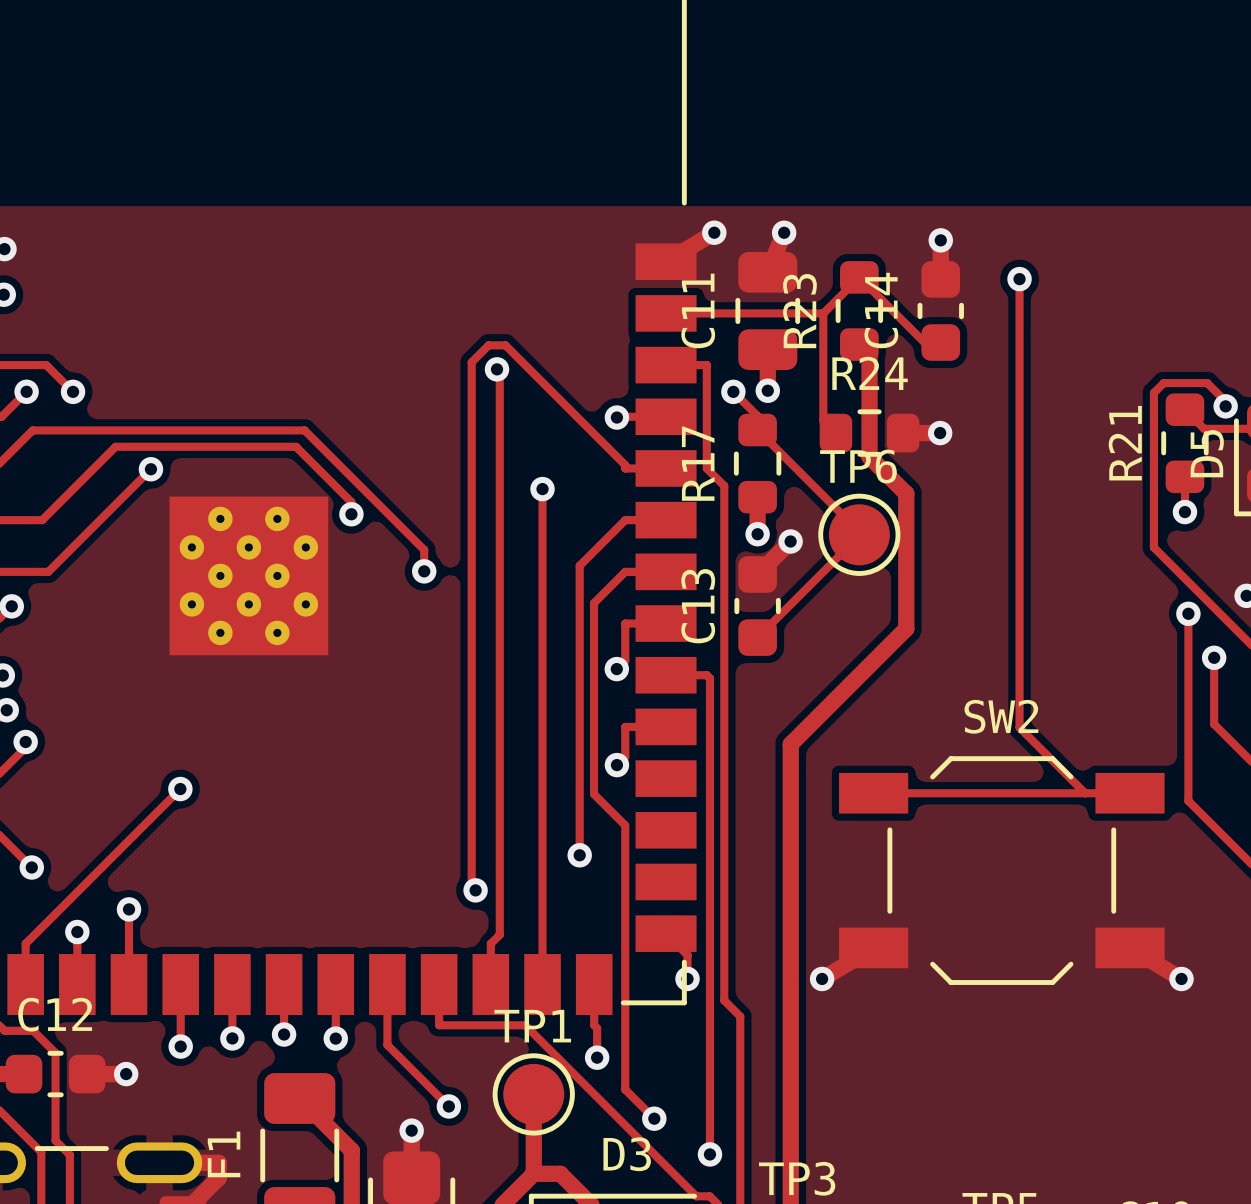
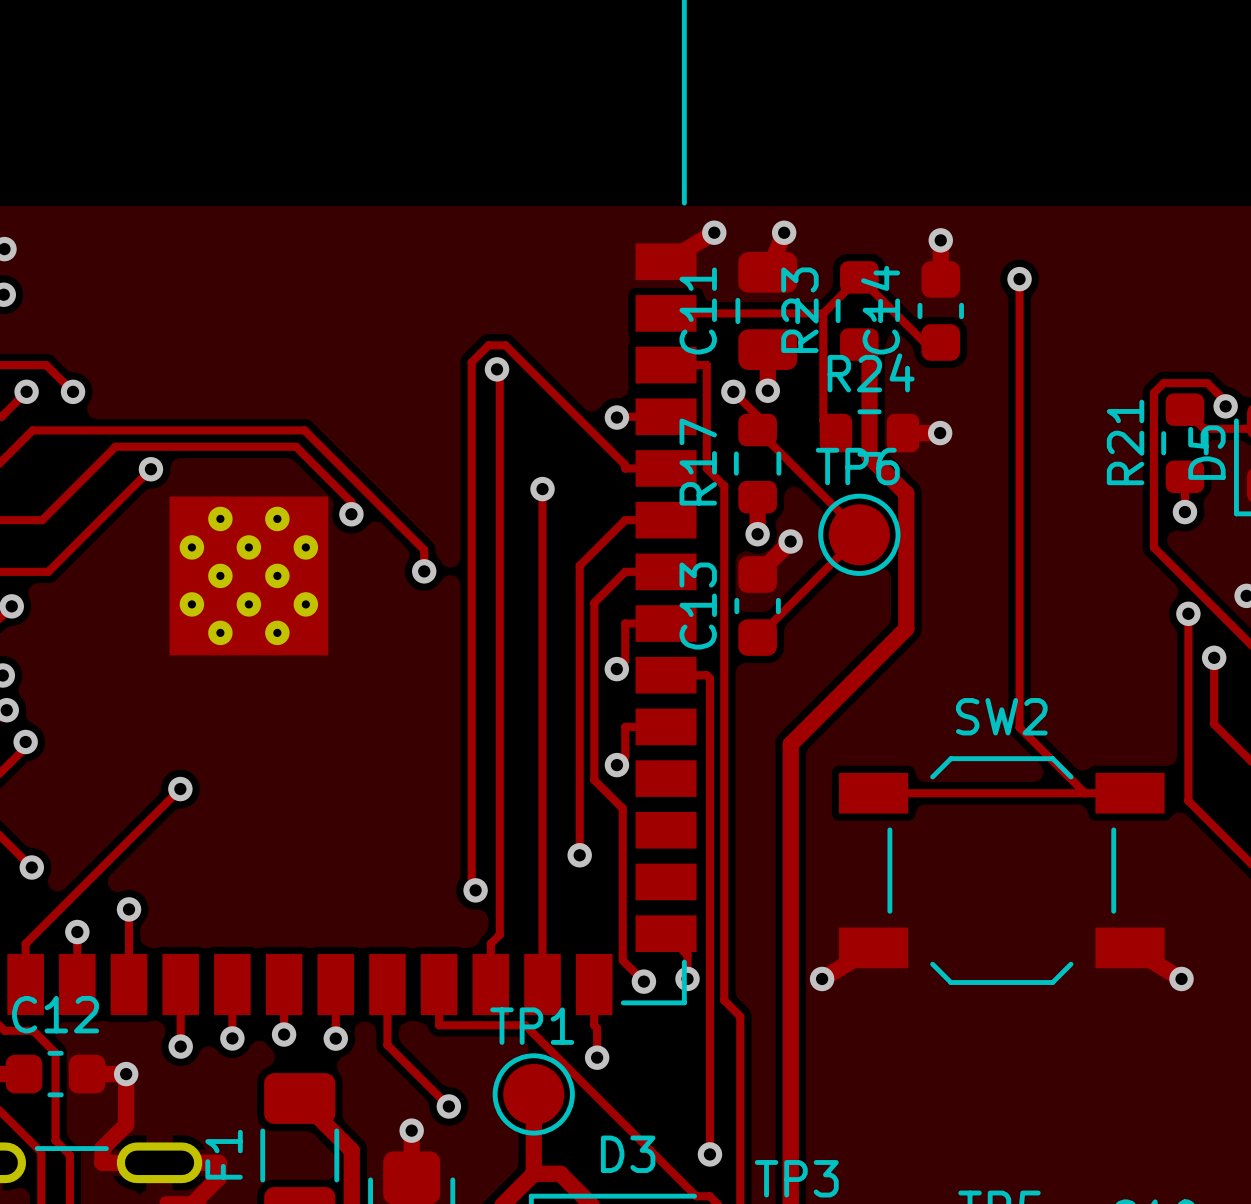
track: (594, 603) (594, 794) (625, 825) (625, 1089) (654, 1118) -> (594, 602) (594, 780) (622, 808) (622, 960) (643, 981)
track: none -> (126, 1074) (126, 1124) (102, 1148) (102, 1162) (159, 1162)
via position: (654, 1118) -> (643, 981)

